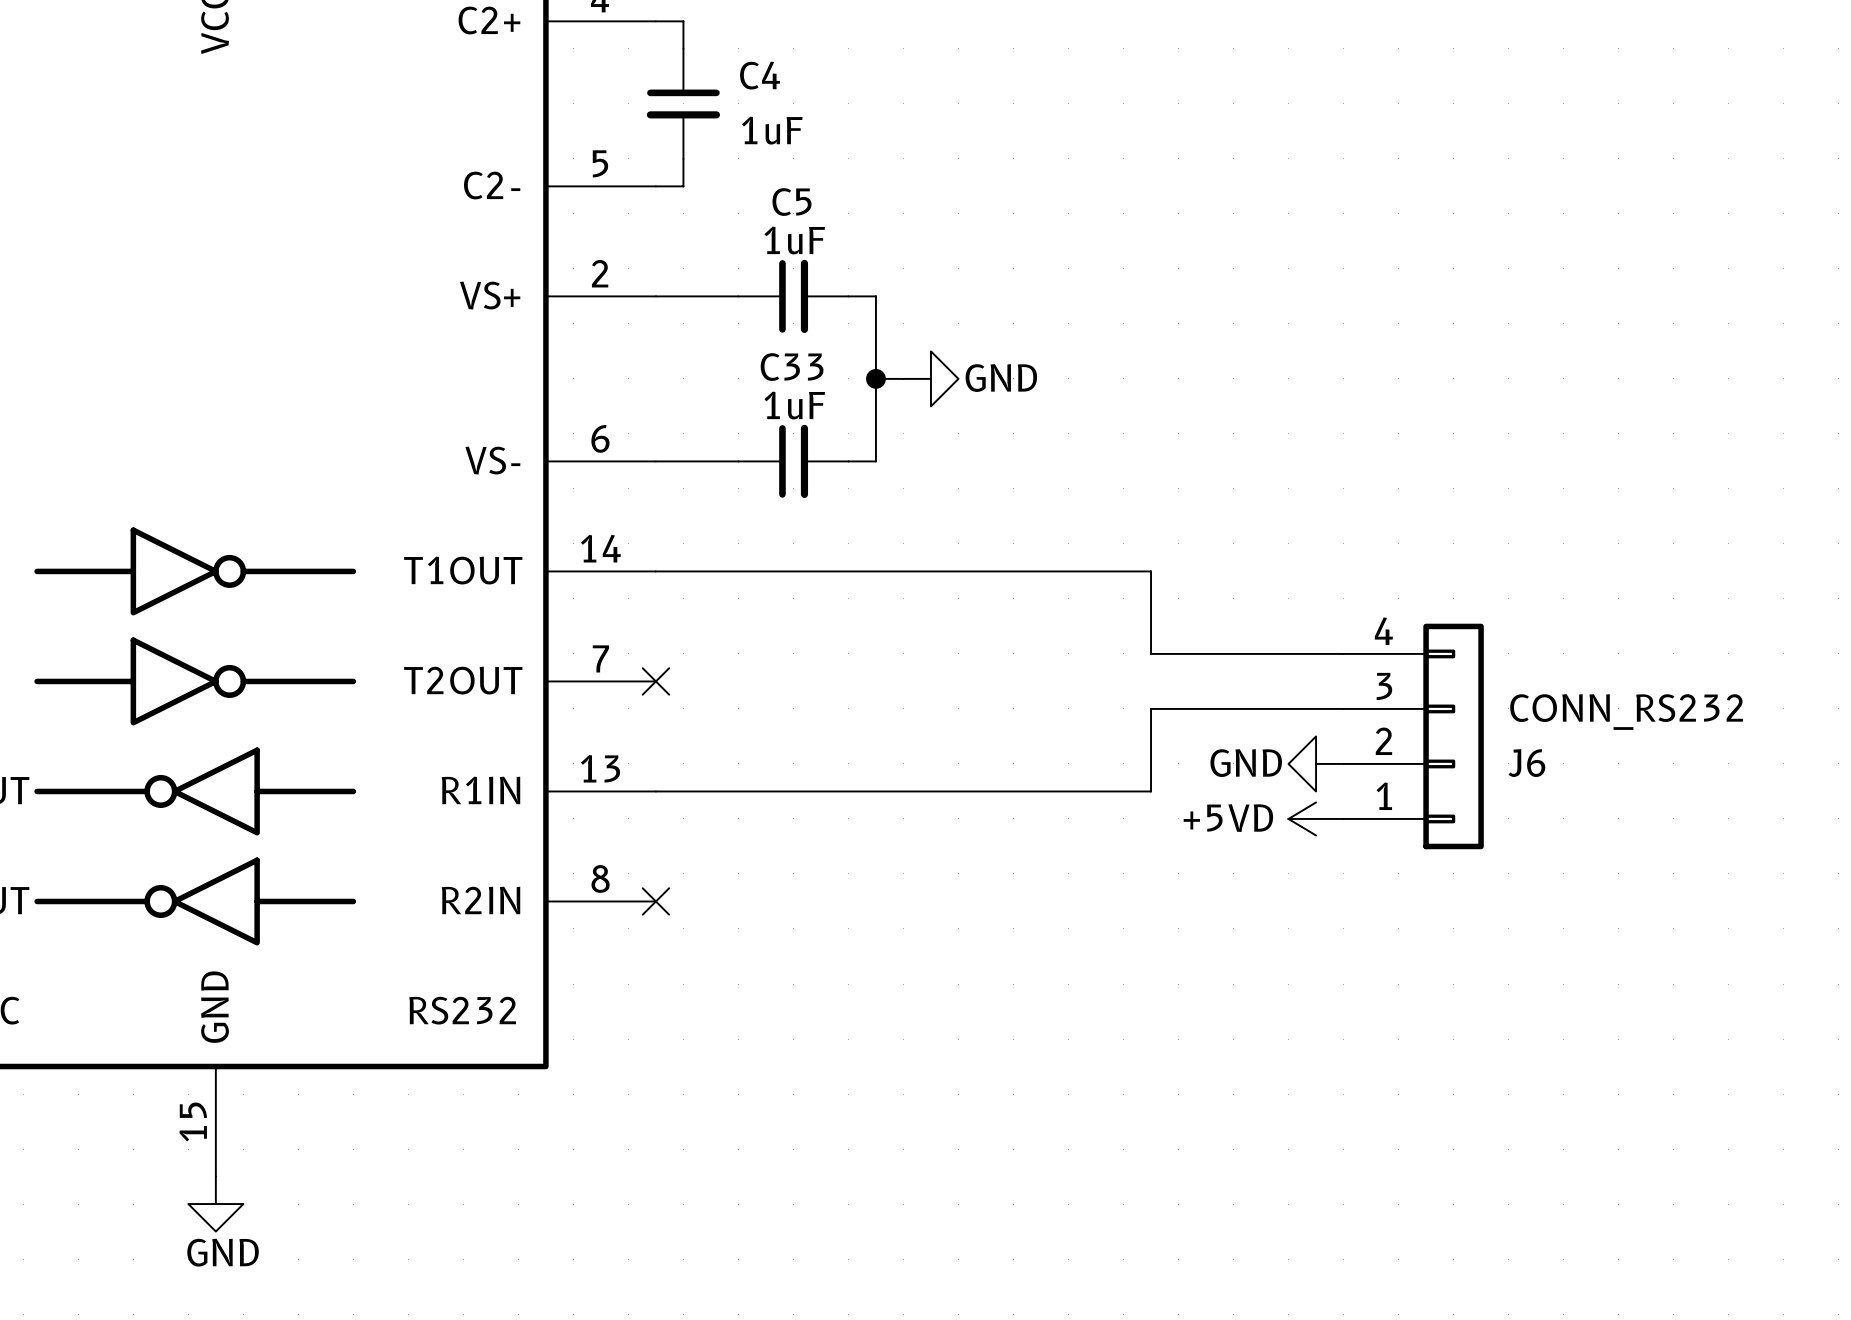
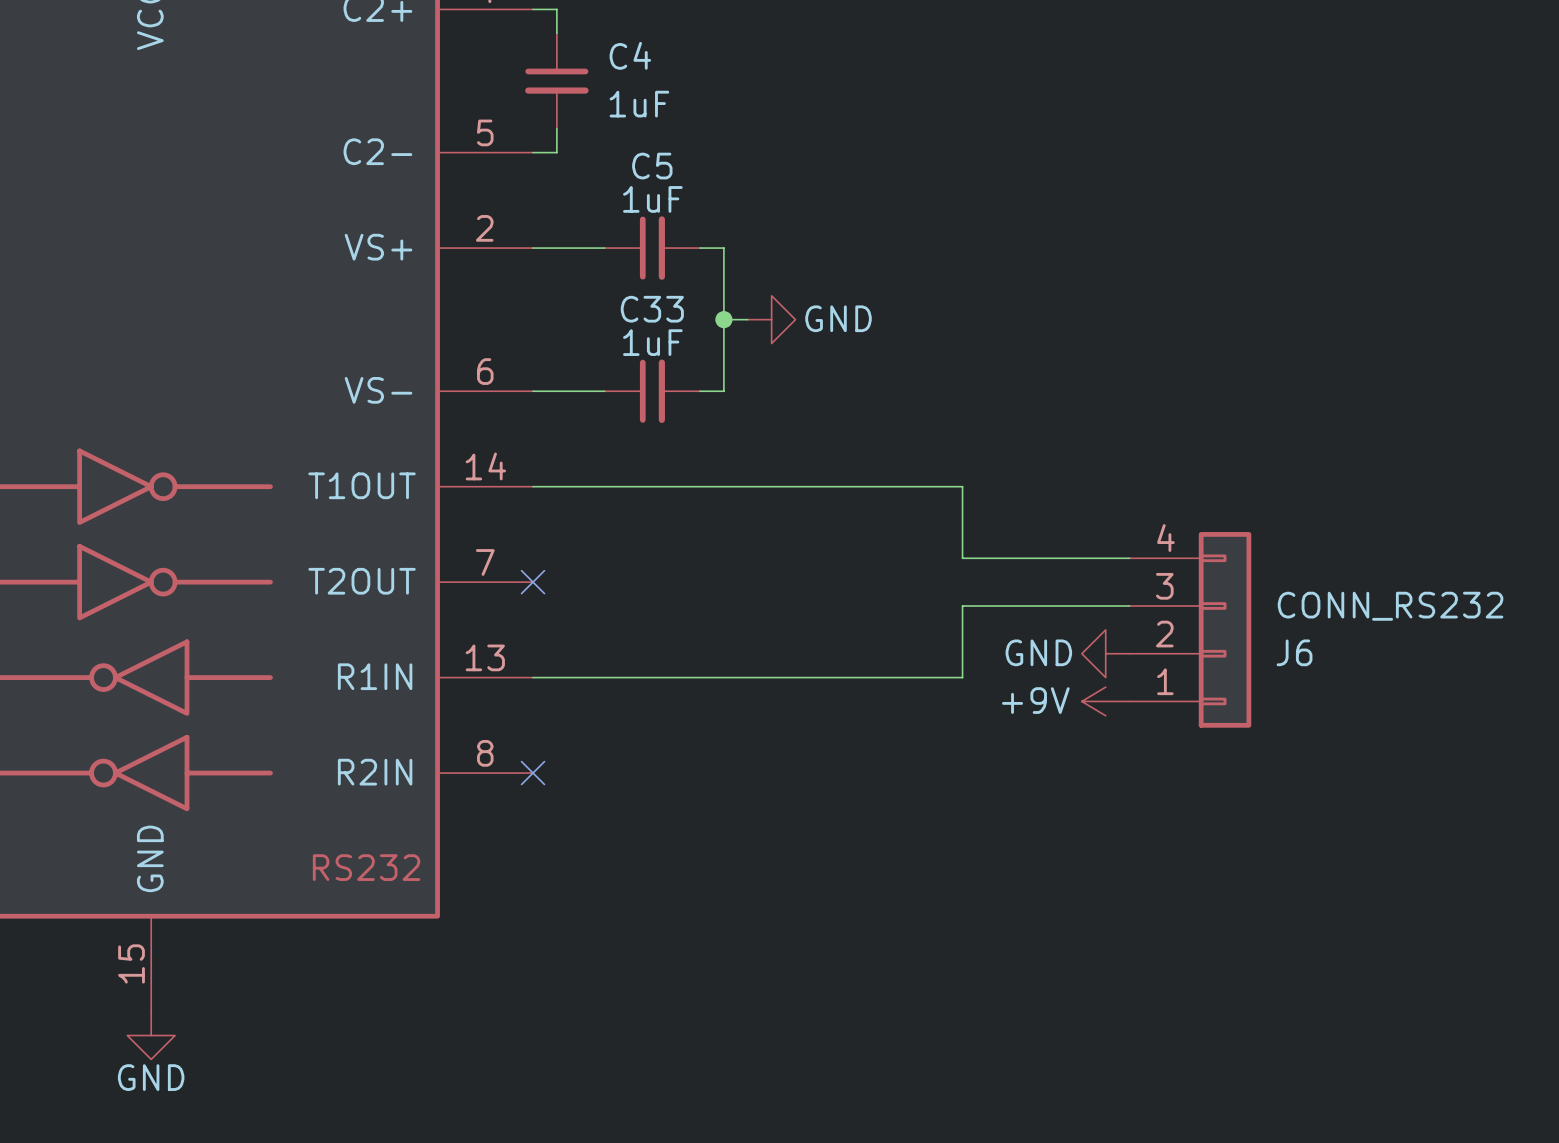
power symbol: +5VD (1316, 818) -> +9V (1105, 701)

